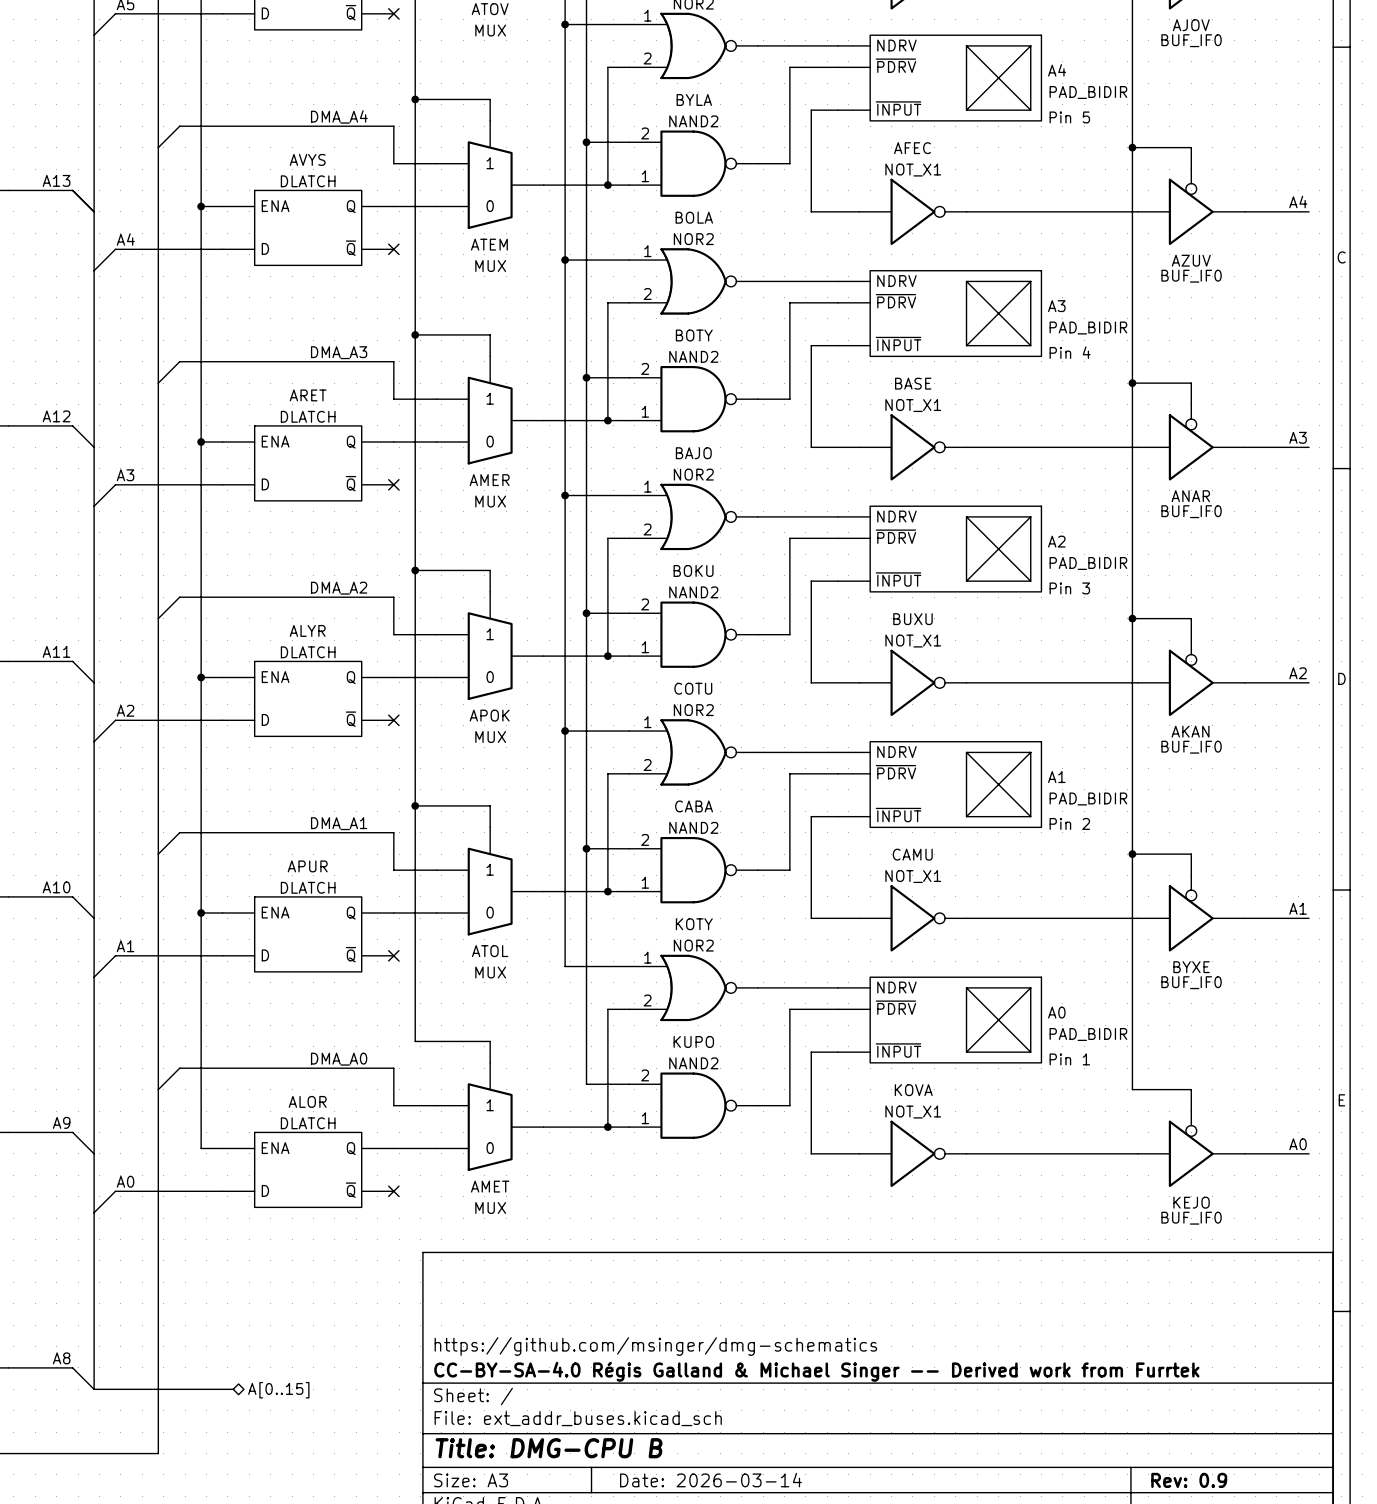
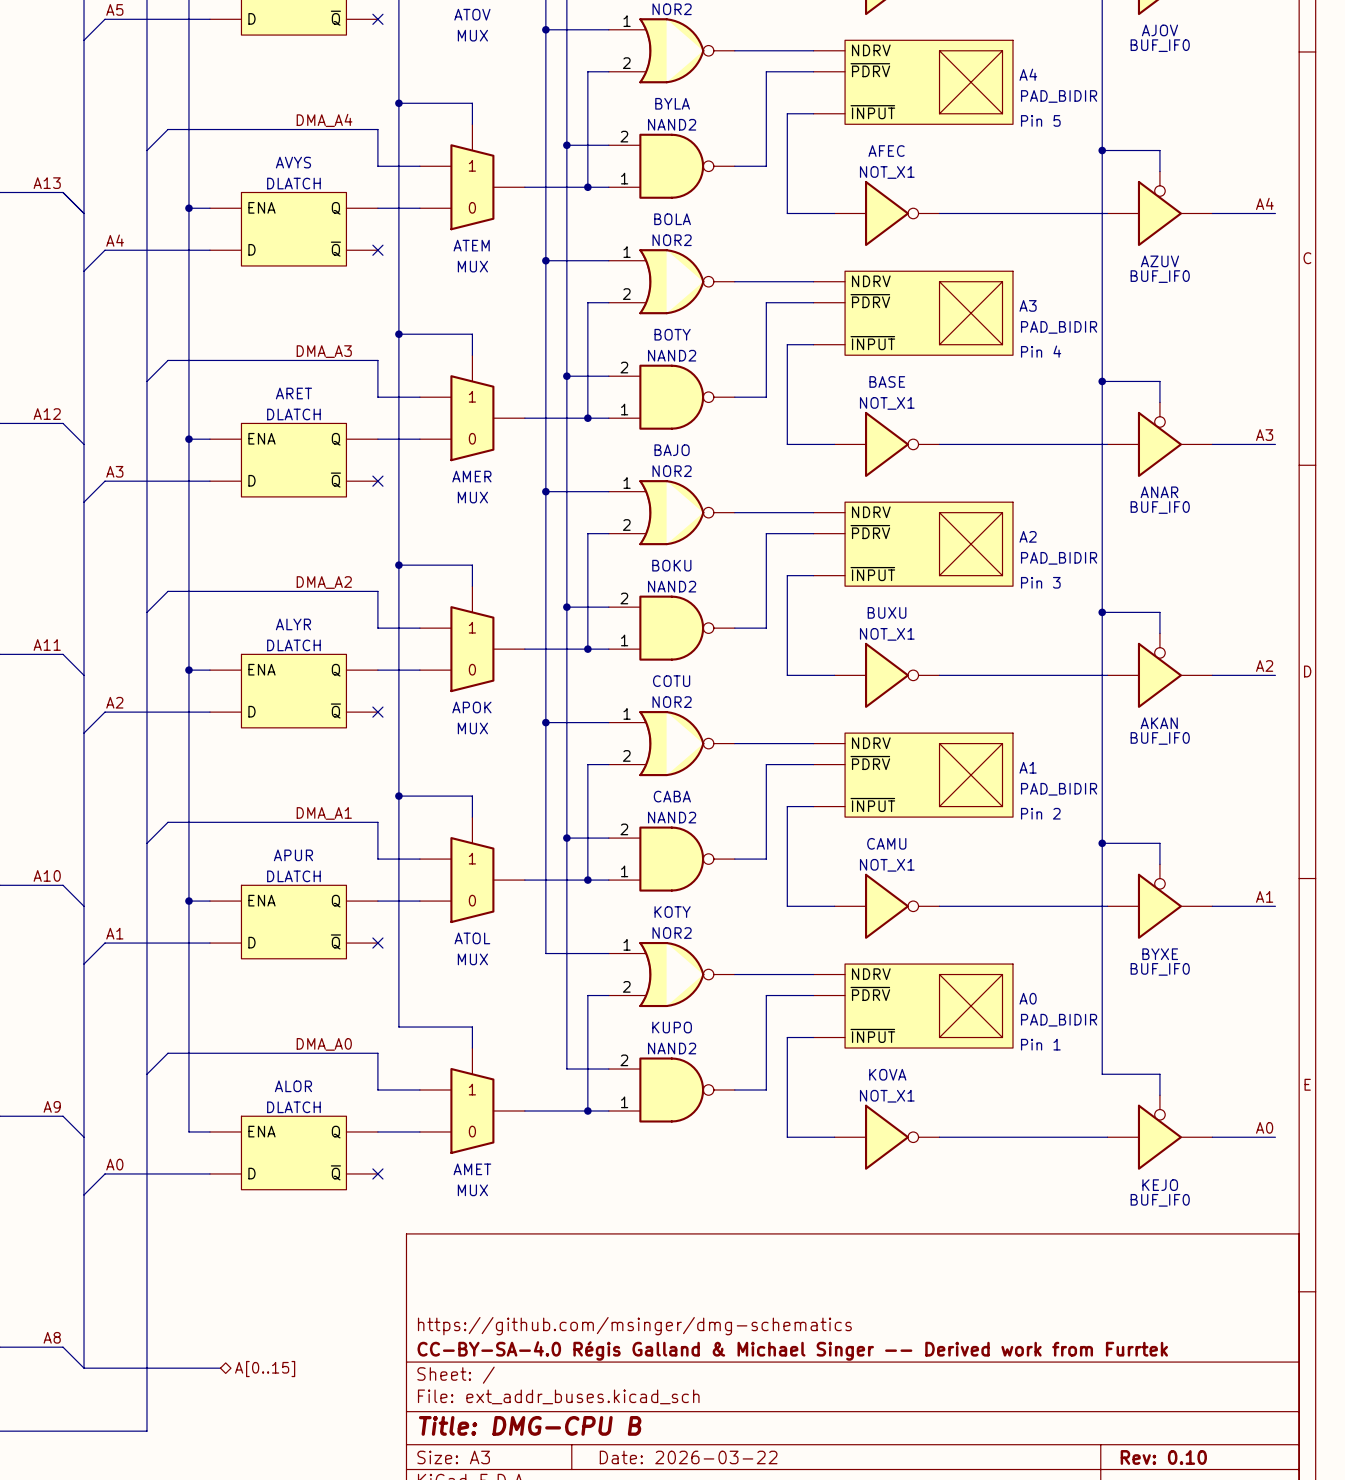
title block: Date: 2026-03-14 (710, 1480) -> Date: 2026-03-22 (688, 1457)
title block: Rev: 0.9 (1189, 1480) -> Rev: 0.10 (1163, 1457)

